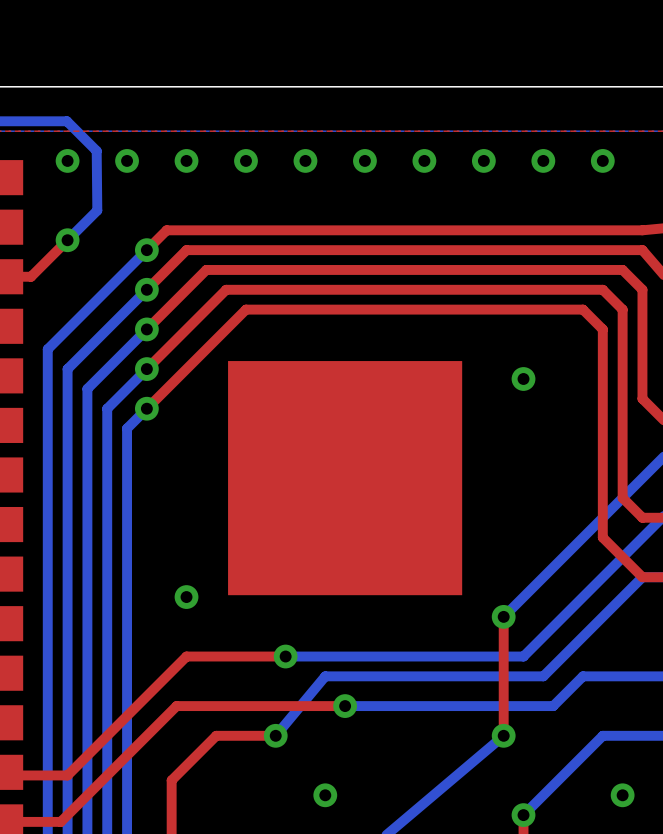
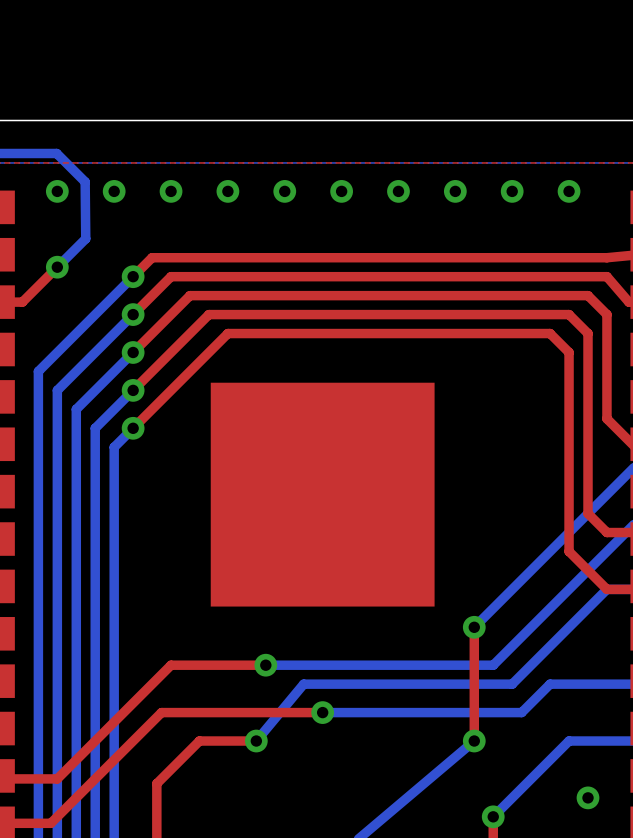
via: (523, 378) -> none
via: (186, 597) -> none
via: (325, 795) -> none

